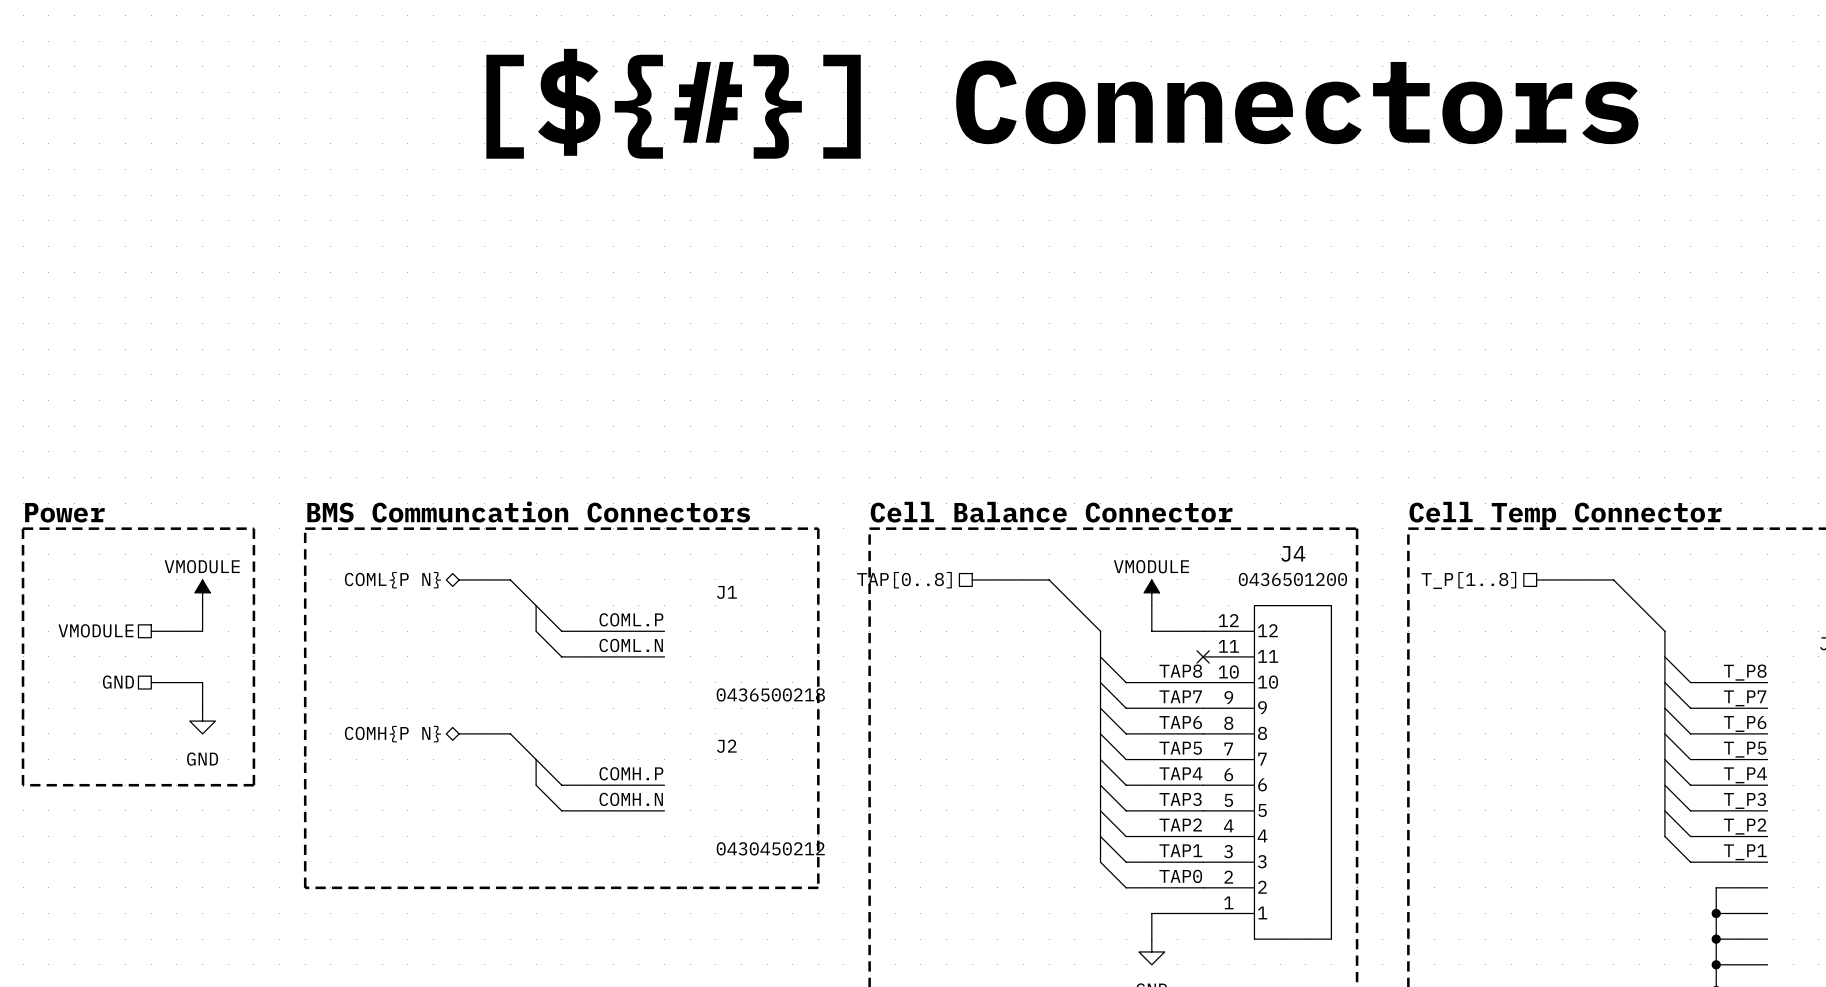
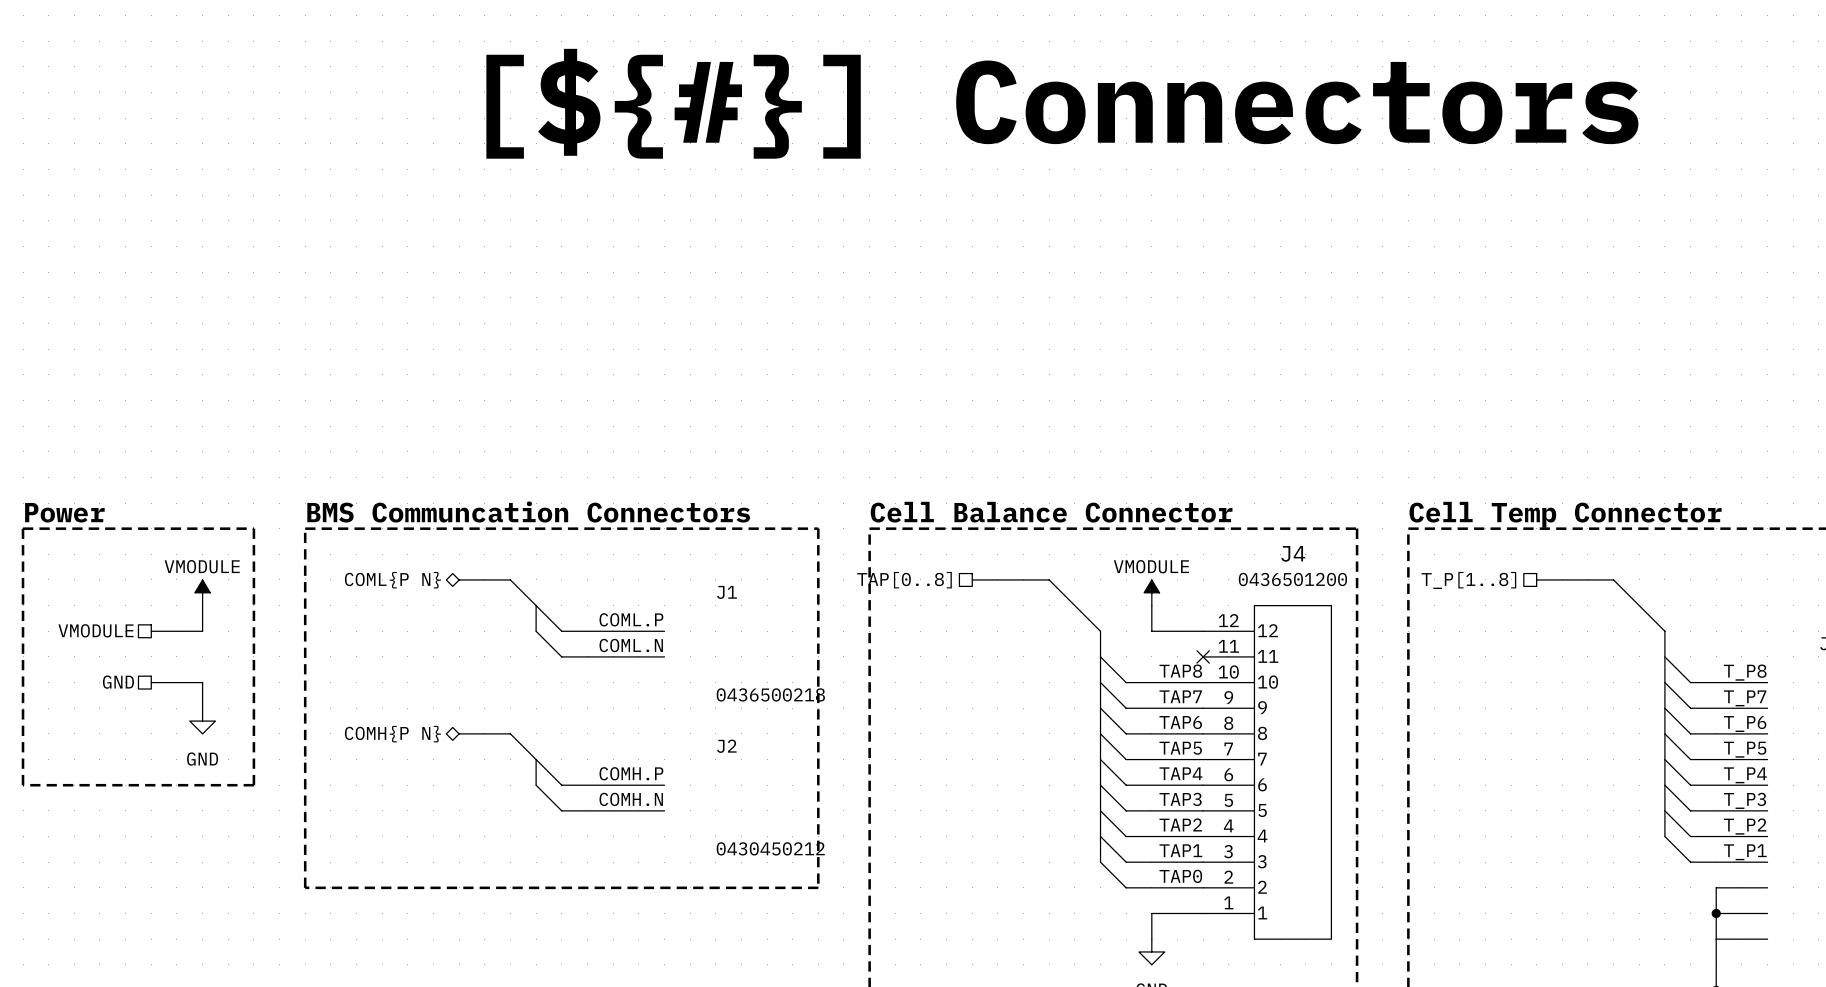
junction: (1716, 939) -> none
wire: (1716, 964) (1767, 964) -> none
junction: (1716, 964) -> none

